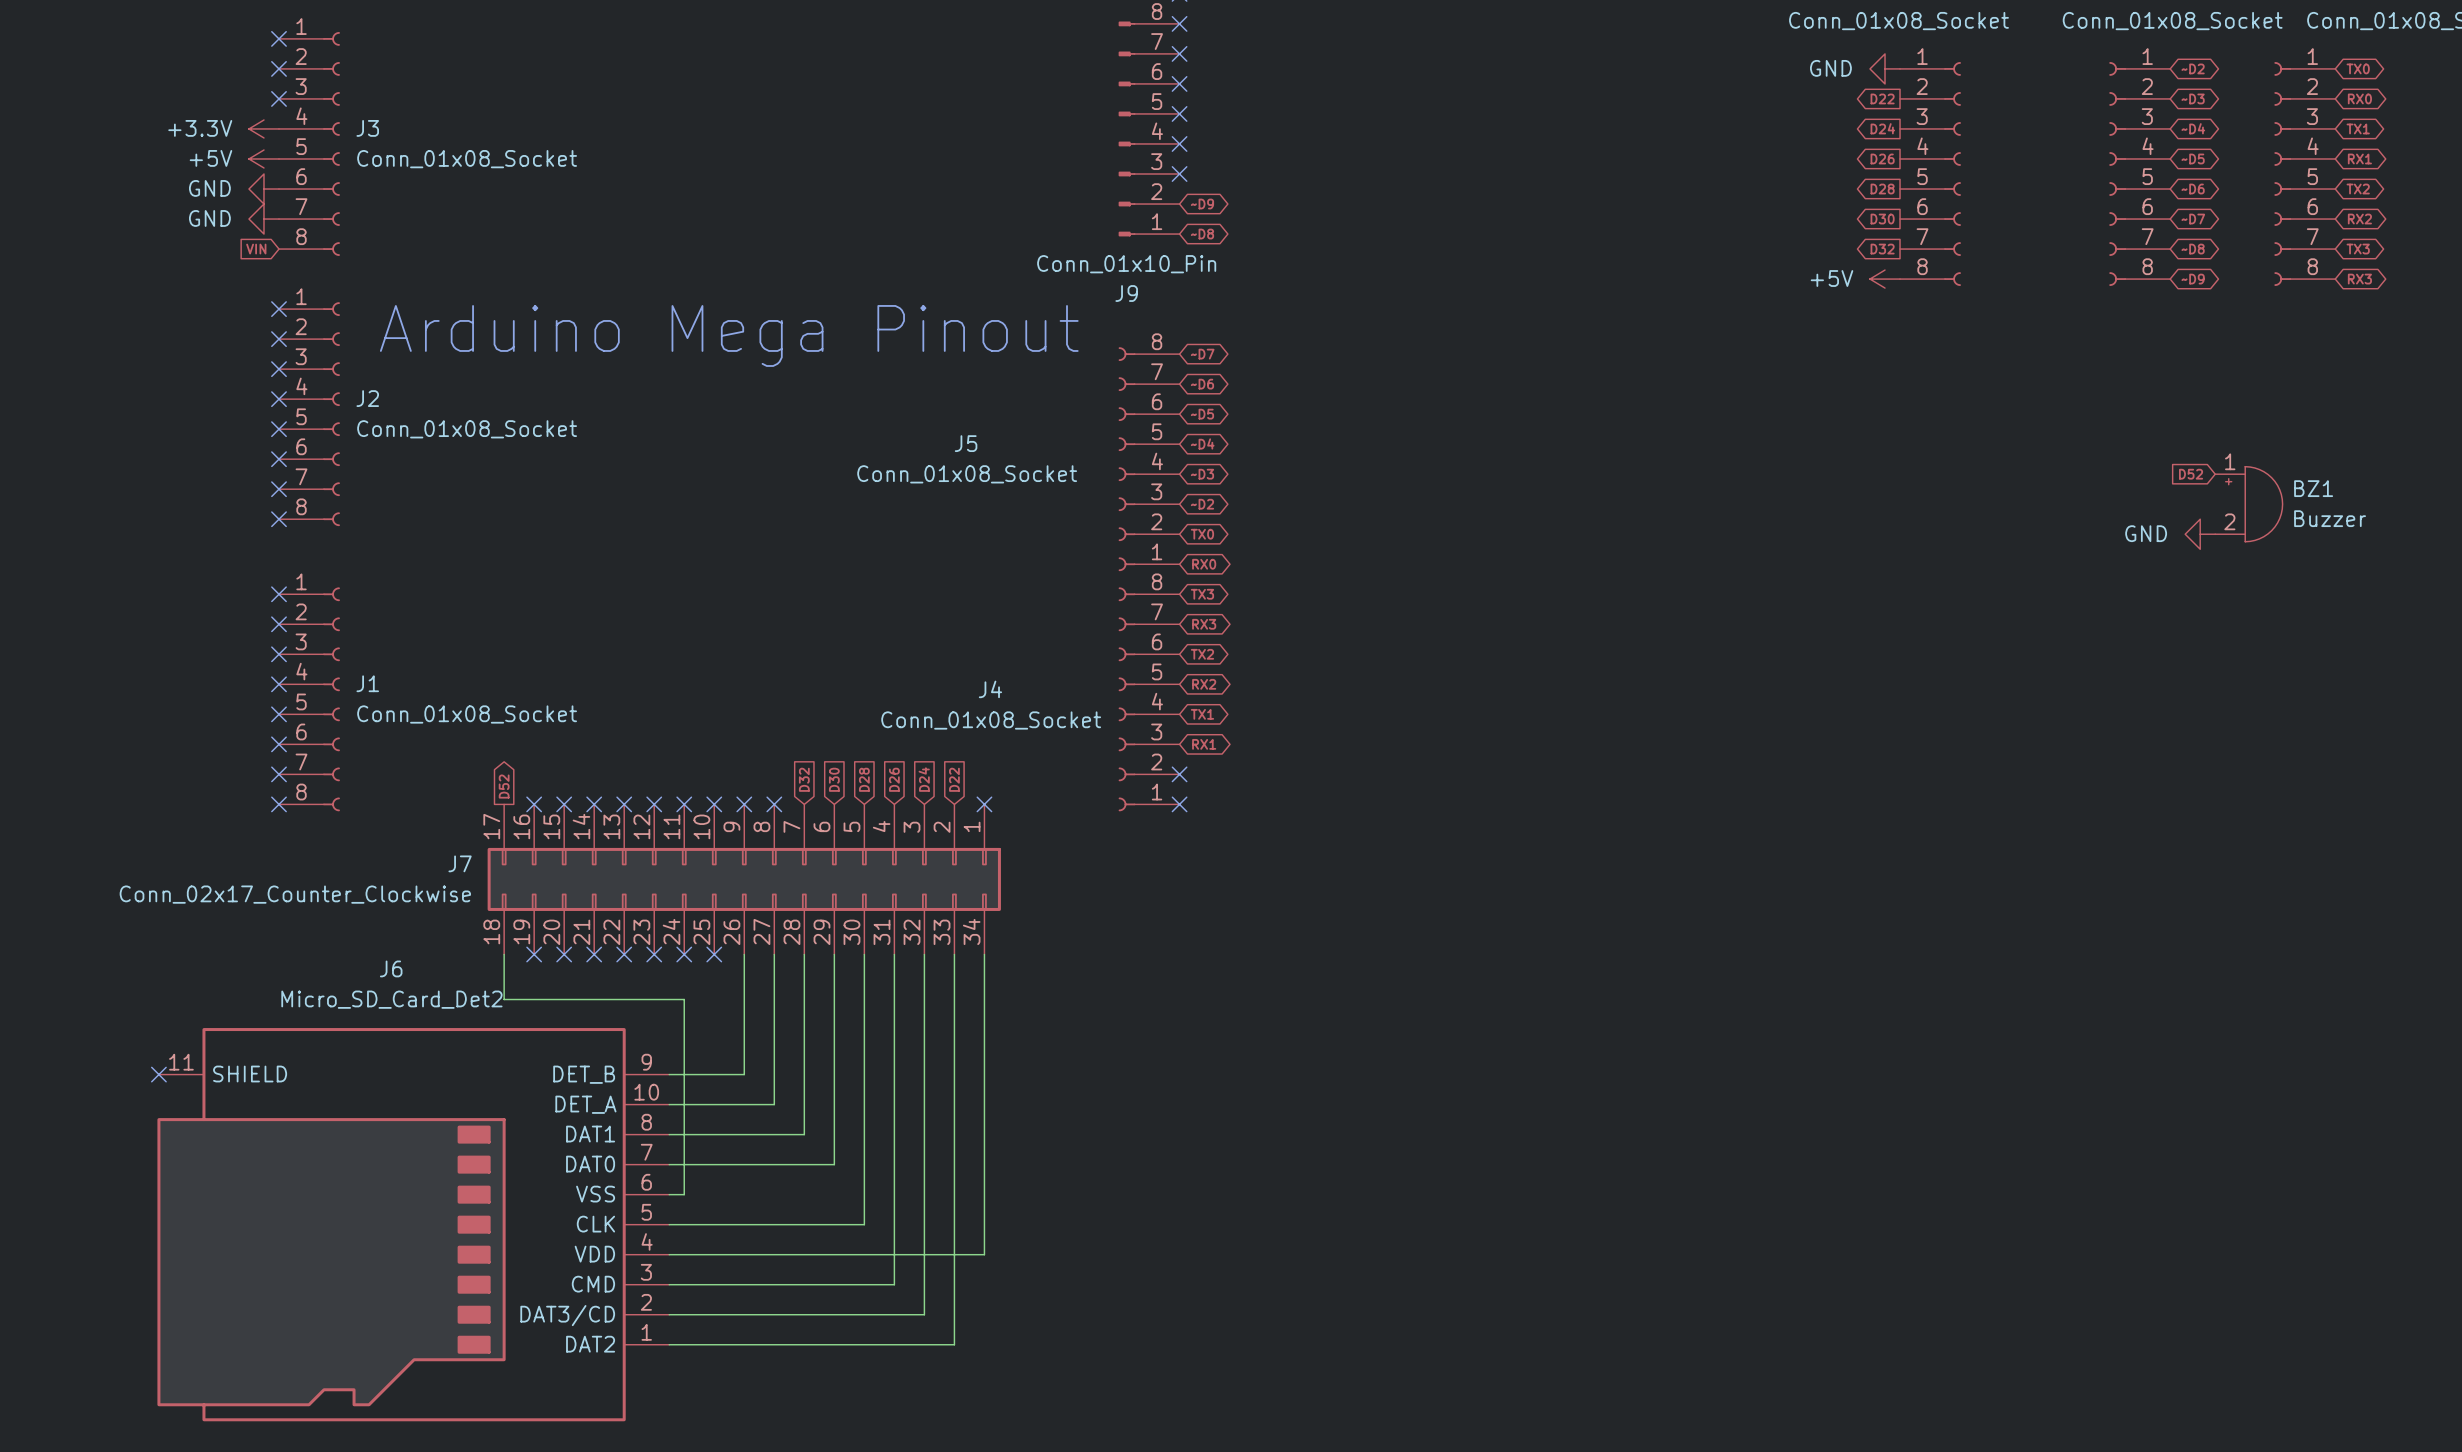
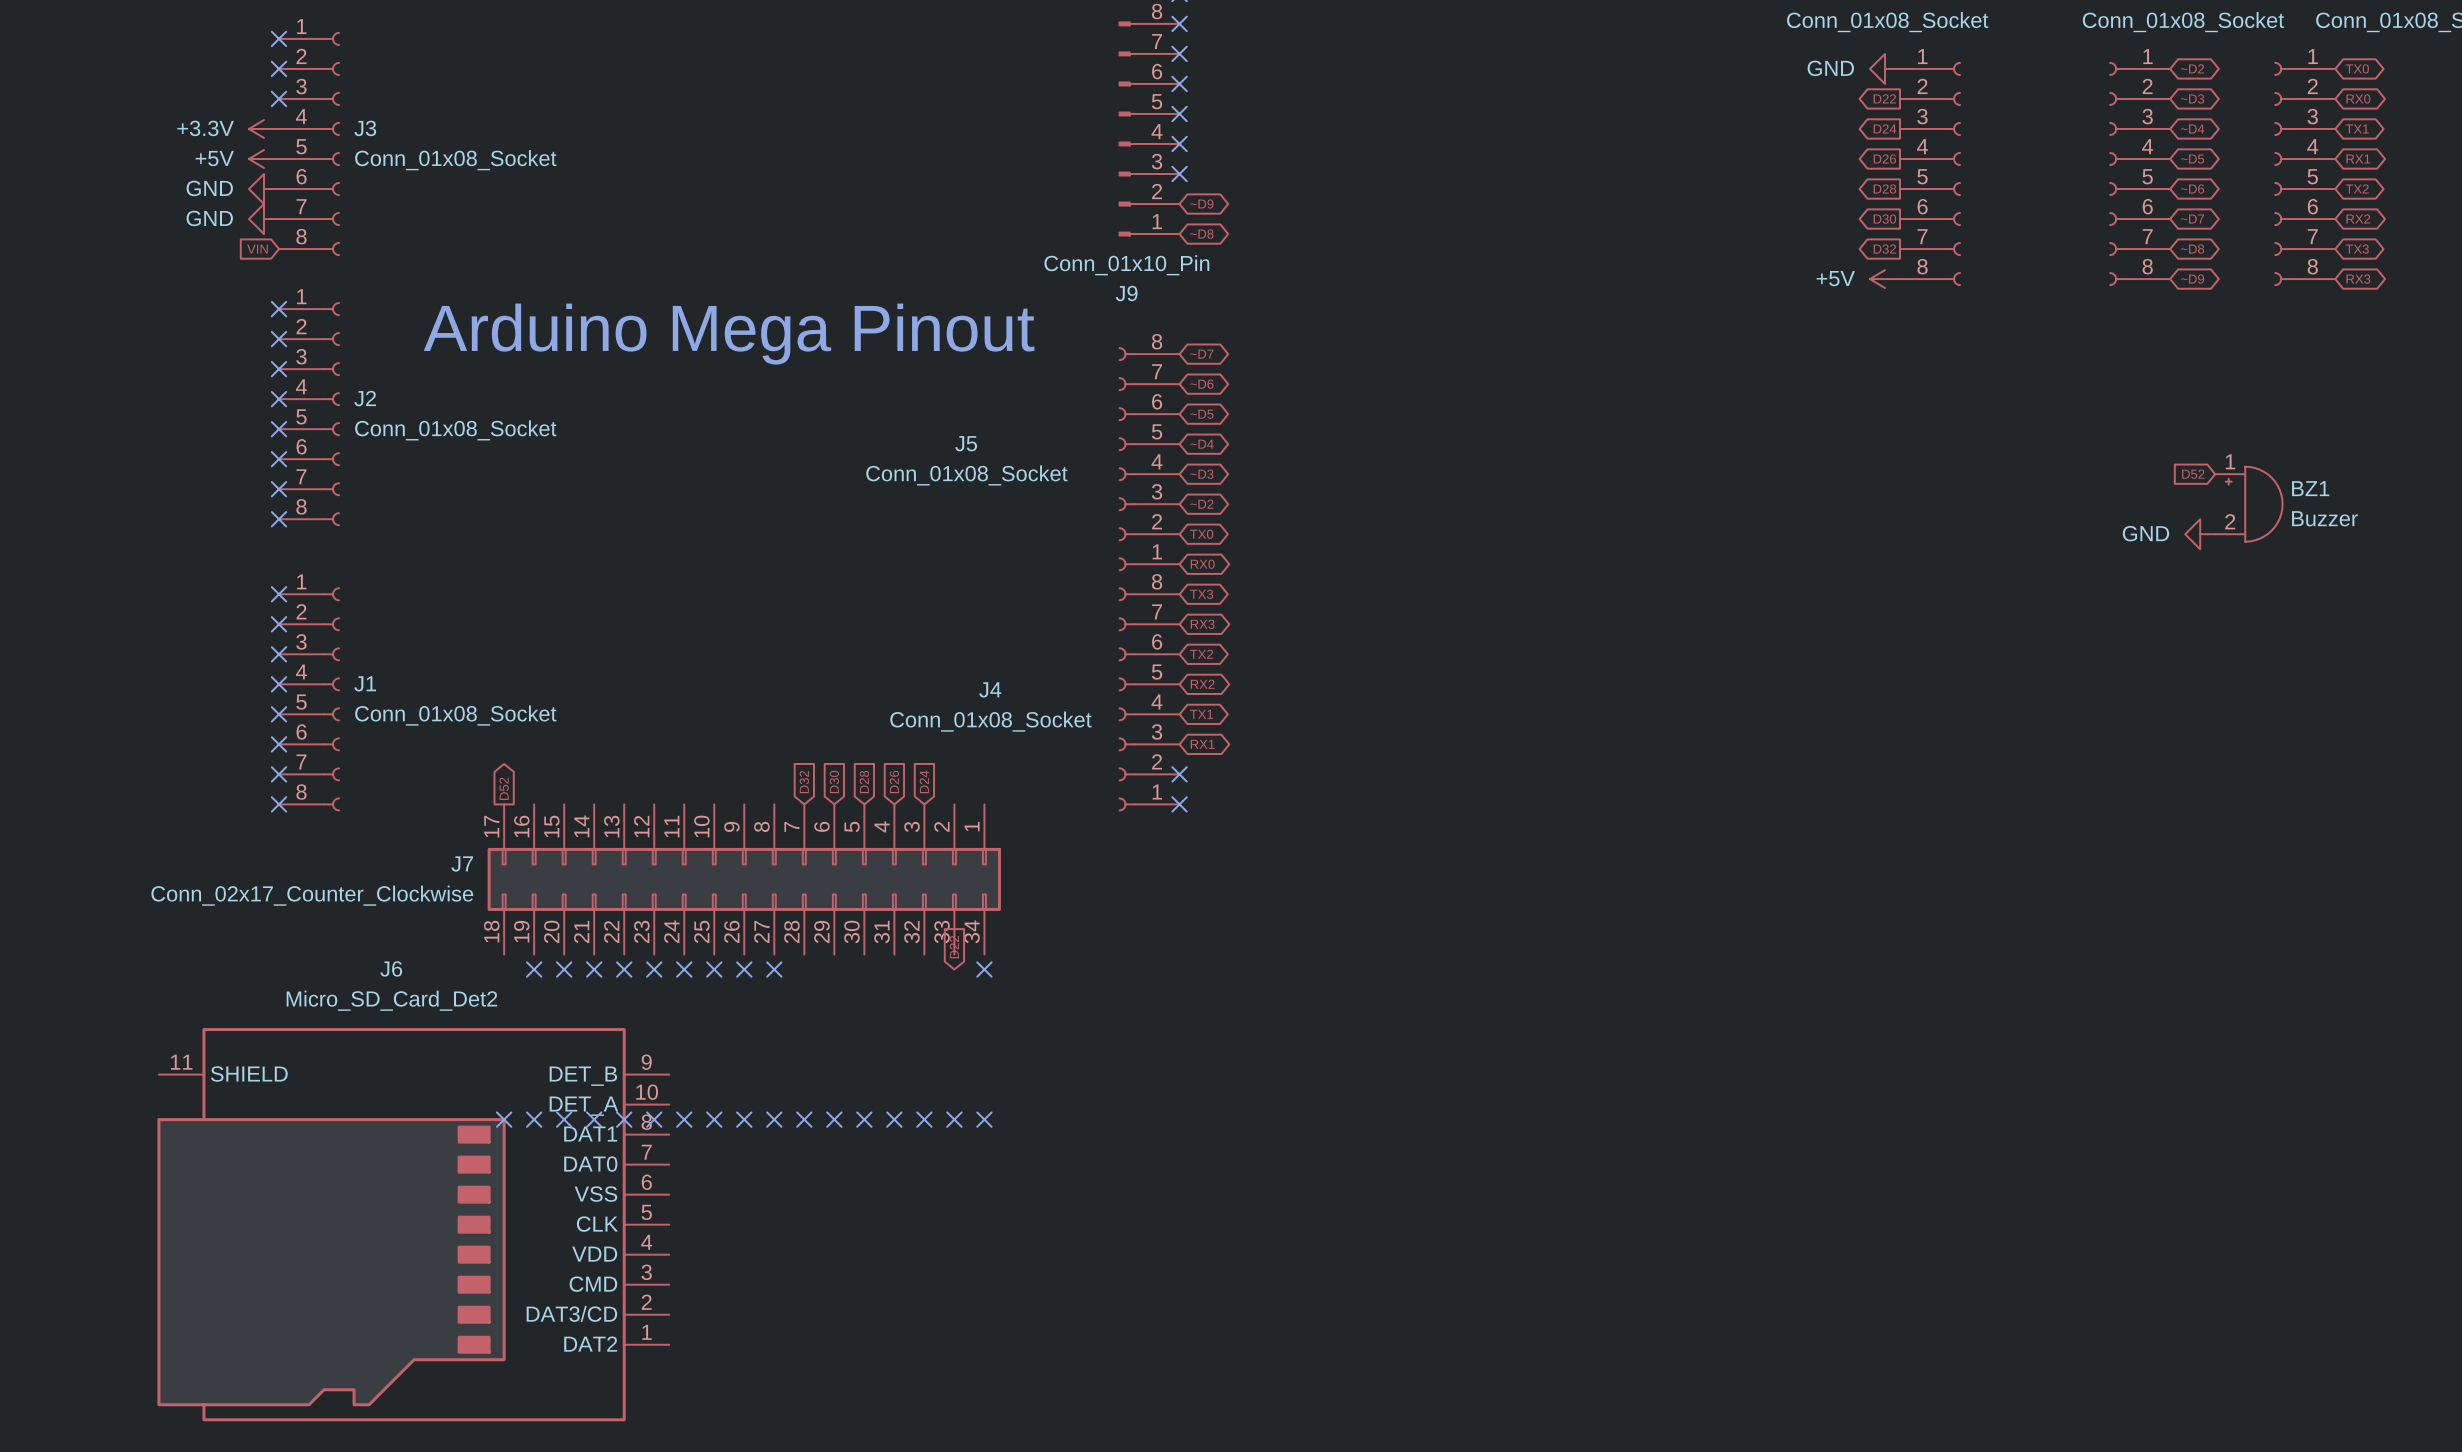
global label position: D22 (954, 779) -> D22 (954, 947)
no-connect mark: (534, 804) -> none
no-connect mark: (564, 804) -> none
no-connect mark: (594, 804) -> none
no-connect mark: (624, 804) -> none
no-connect mark: (654, 804) -> none
no-connect mark: (684, 804) -> none
no-connect mark: (714, 804) -> none
no-connect mark: (744, 804) -> none
no-connect mark: (774, 804) -> none
no-connect mark: (984, 804) -> none
wire: (504, 954) (504, 999) (684, 999) (684, 1194) (669, 1194) -> none
no-connect mark position: (534, 954) -> (534, 969)
no-connect mark position: (564, 954) -> (564, 969)
no-connect mark position: (594, 954) -> (594, 969)
no-connect mark position: (624, 954) -> (624, 969)
no-connect mark position: (654, 954) -> (654, 969)
no-connect mark position: (684, 954) -> (684, 969)
no-connect mark position: (714, 954) -> (714, 969)
wire: (744, 954) (744, 1074) (669, 1074) -> none
wire: (774, 954) (774, 1104) (669, 1104) -> none
wire: (804, 954) (804, 1134) (669, 1134) -> none
wire: (834, 954) (834, 1164) (669, 1164) -> none
wire: (864, 954) (864, 1224) (669, 1224) -> none
wire: (894, 954) (894, 1284) (669, 1284) -> none
wire: (924, 954) (924, 1314) (669, 1314) -> none
wire: (954, 954) (954, 1344) (669, 1344) -> none
wire: (984, 954) (984, 1254) (669, 1254) -> none
no-connect mark: none -> (744, 969)
no-connect mark: none -> (774, 969)
no-connect mark: none -> (984, 969)
no-connect mark: (158, 1074) -> none
no-connect mark: none -> (504, 1119)
no-connect mark: none -> (534, 1119)
no-connect mark: none -> (564, 1119)
no-connect mark: none -> (594, 1119)
no-connect mark: none -> (624, 1119)
no-connect mark: none -> (654, 1119)
no-connect mark: none -> (684, 1119)
no-connect mark: none -> (714, 1119)
no-connect mark: none -> (744, 1119)
no-connect mark: none -> (774, 1119)
no-connect mark: none -> (804, 1119)
no-connect mark: none -> (834, 1119)
no-connect mark: none -> (864, 1119)
no-connect mark: none -> (894, 1119)
no-connect mark: none -> (924, 1119)
no-connect mark: none -> (954, 1119)
no-connect mark: none -> (984, 1119)

